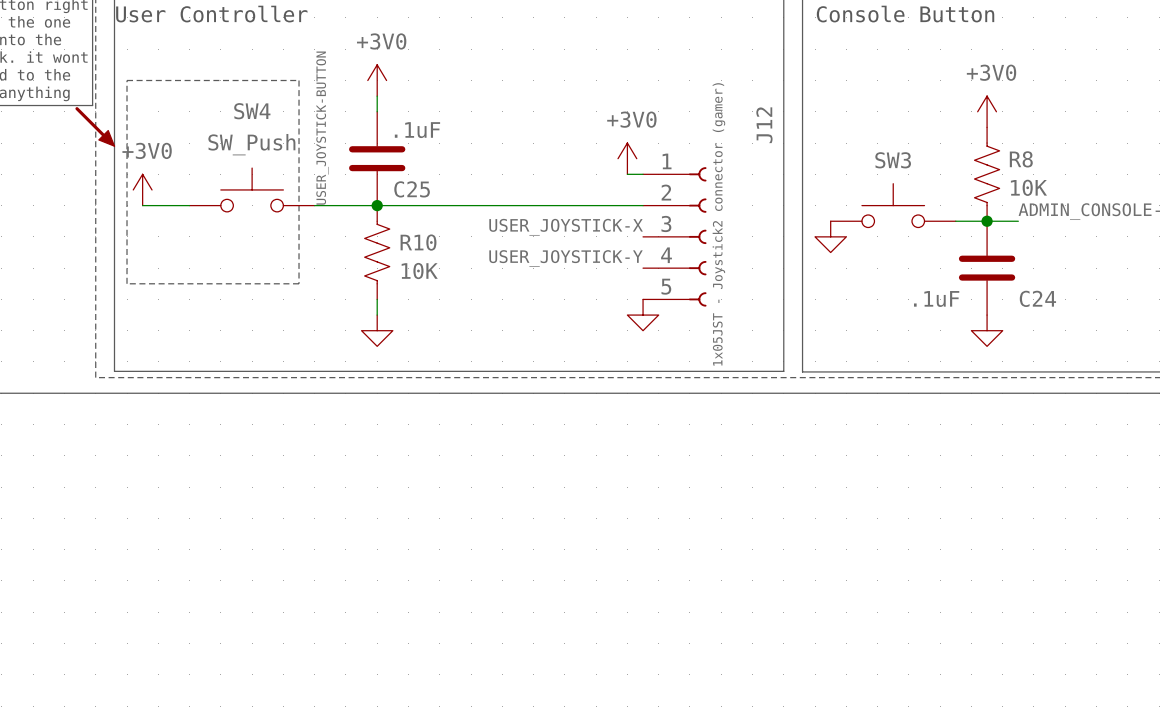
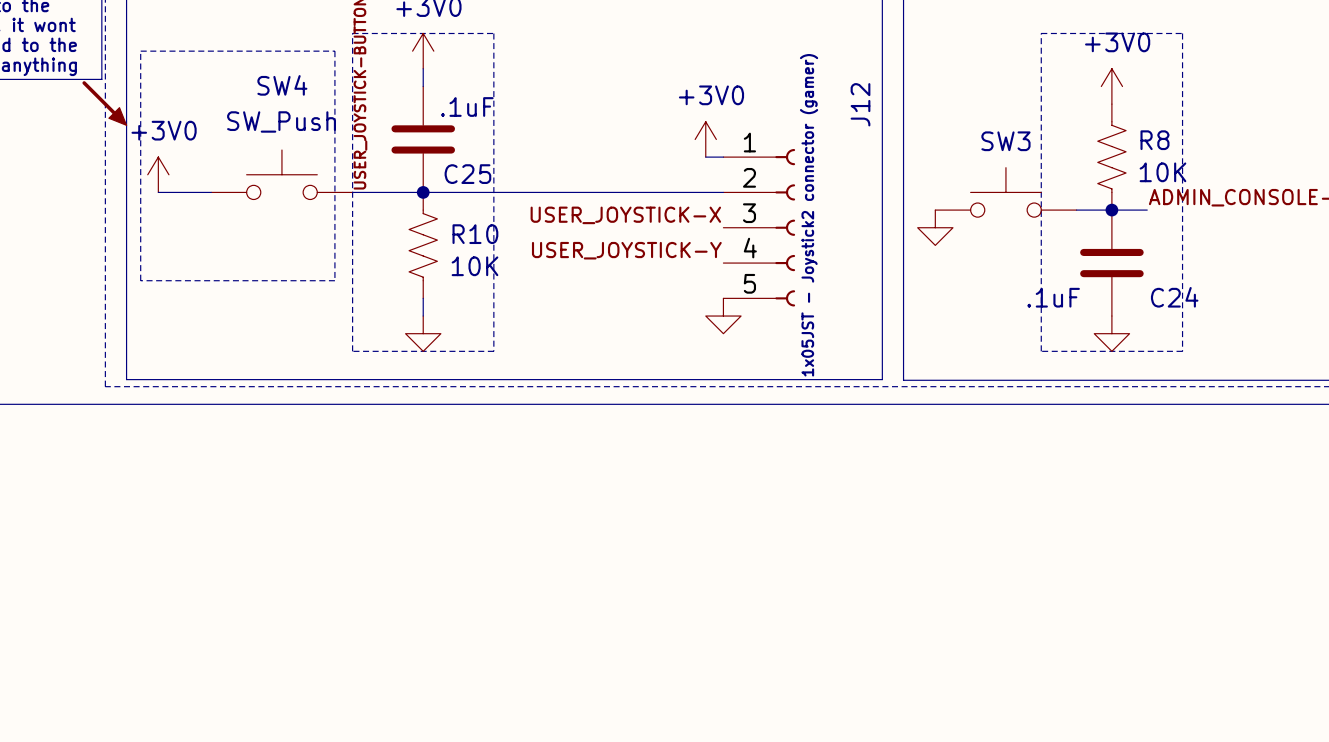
line: none -> (352, 33) (493, 33) (493, 351) (352, 351) (352, 33)
line: none -> (1041, 33) (1182, 33) (1182, 351) (1041, 351) (1041, 33)

